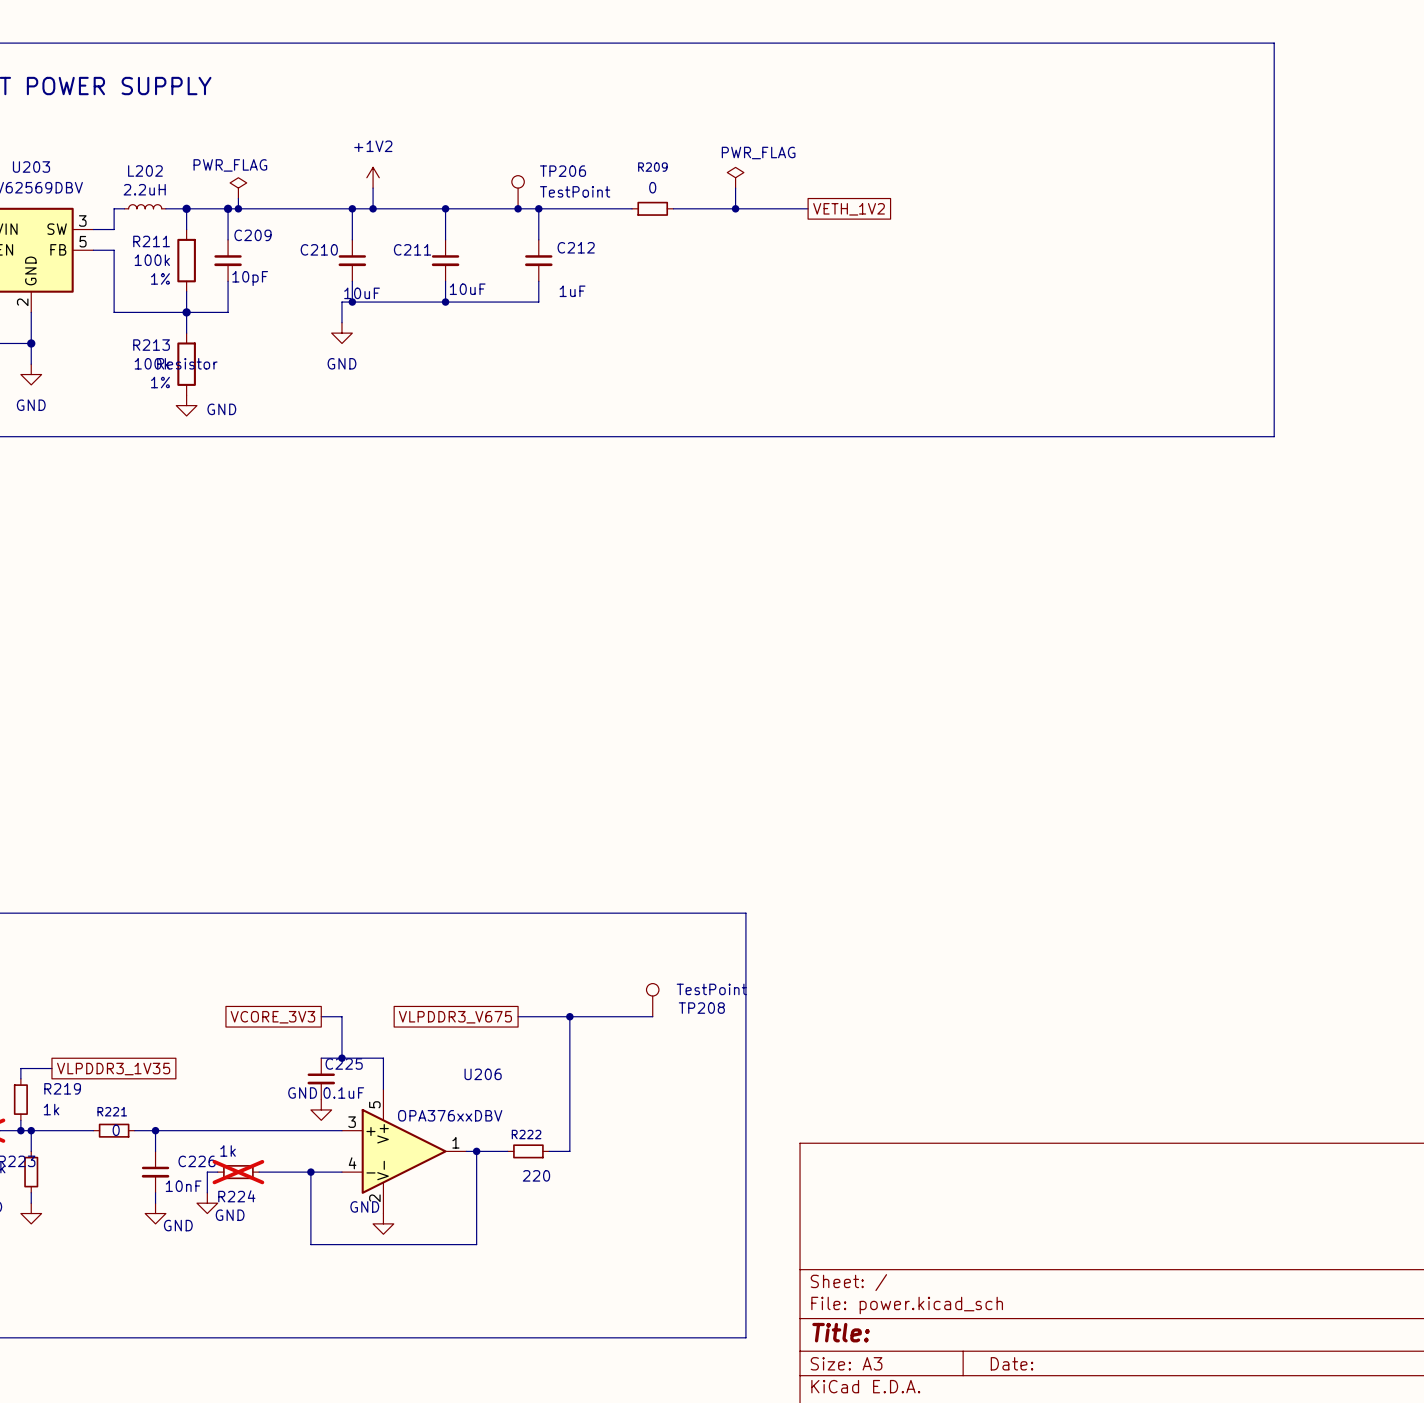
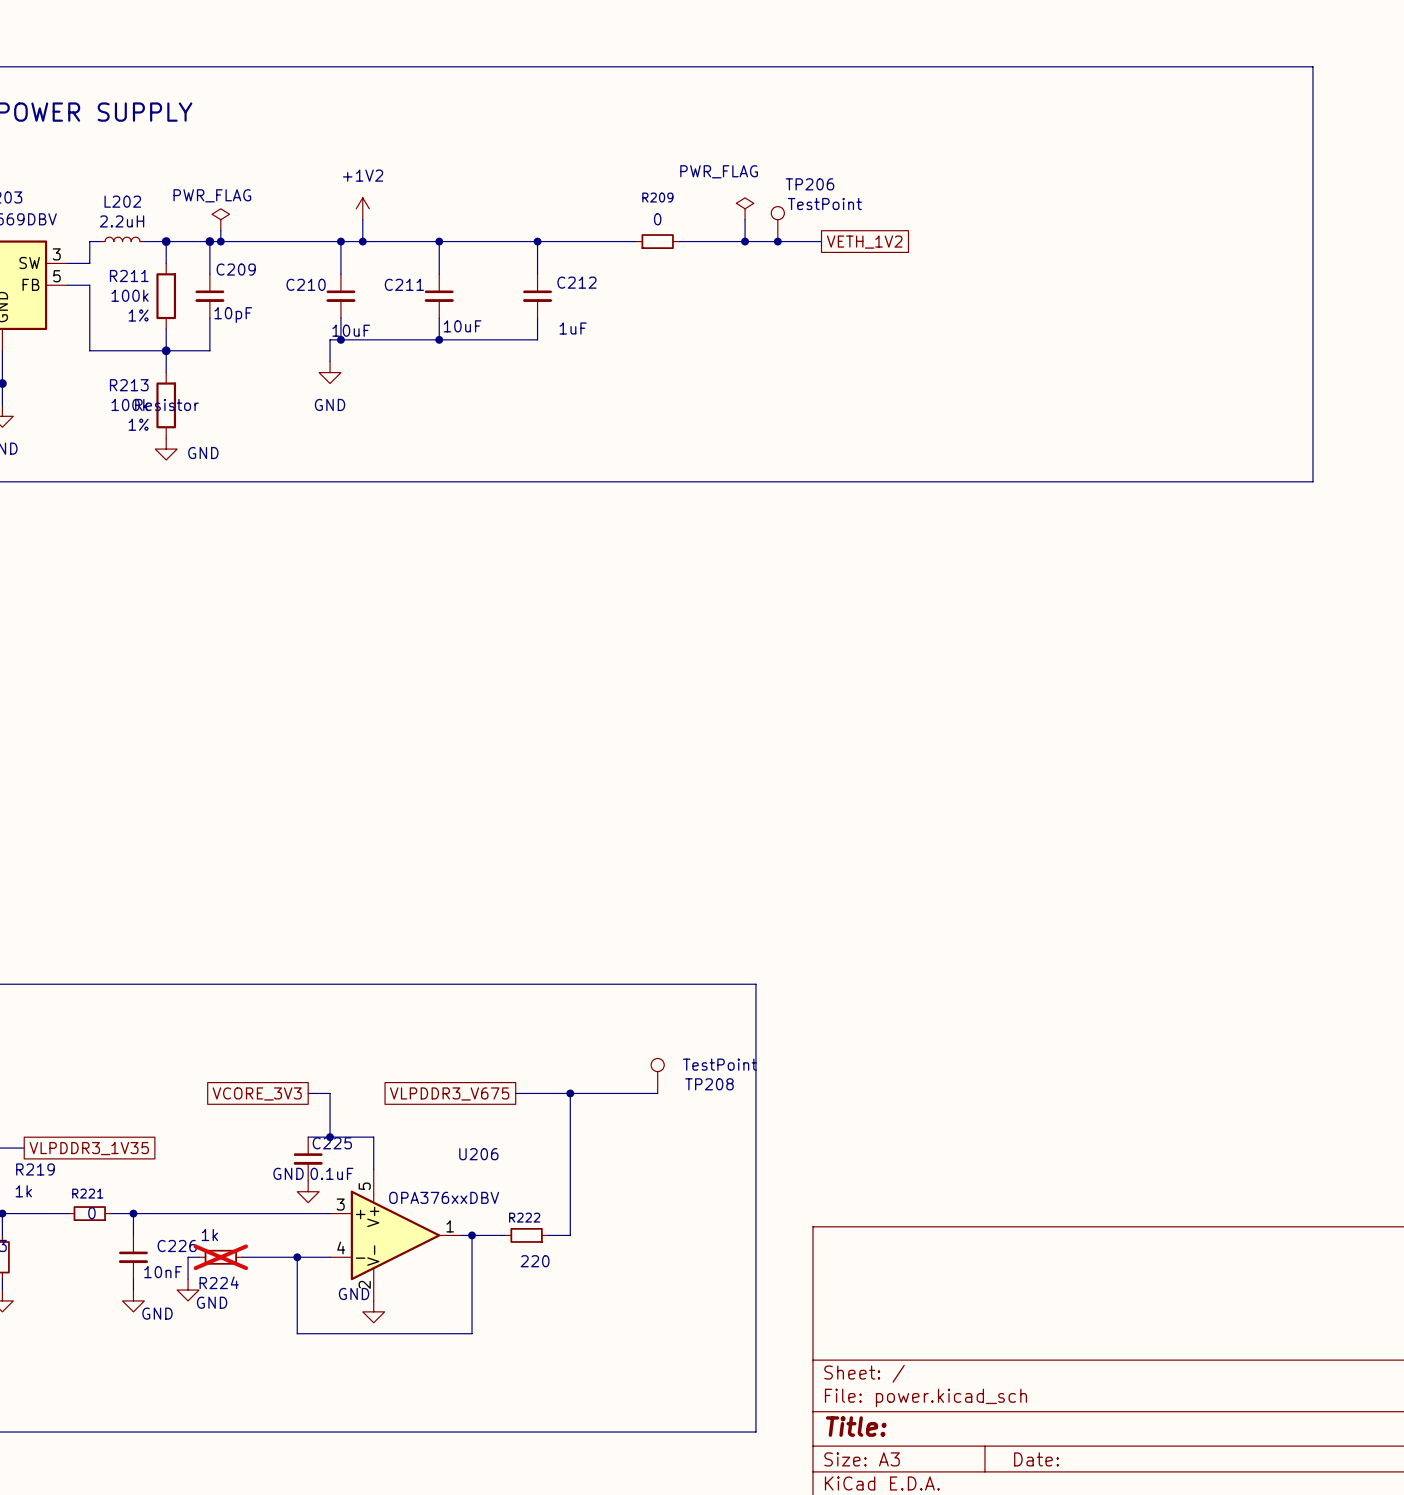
power symbol text position: PWR_FLAG (758, 152) -> PWR_FLAG (719, 171)
TP206 name position: TP206 (563, 171) -> TP206 (809, 184)
TP206 value position: TestPoint (575, 191) -> TestPoint (824, 204)
TP206 position: (518, 192) -> (777, 224)
junction: (518, 208) -> none
junction: none -> (777, 241)

